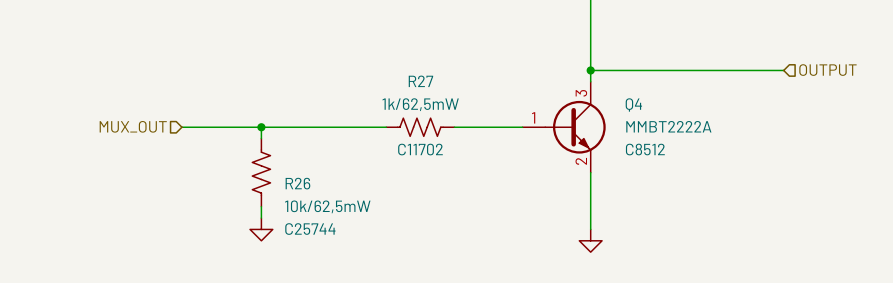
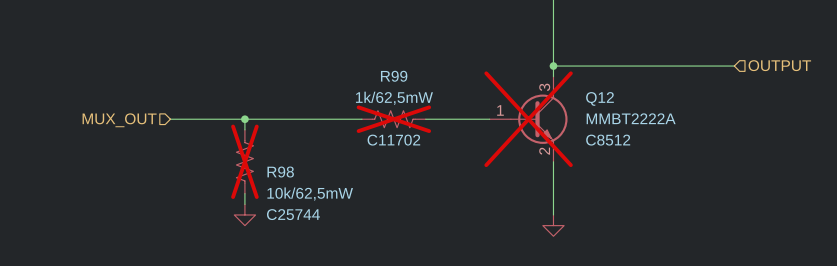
R27 name: R27 (420, 81) -> R99 (394, 76)
Q4 name: Q4 (633, 104) -> Q12 (599, 98)
R27 do-not-place cross: none -> (393, 119)
Q4 do-not-place cross: none -> (528, 119)
R26 do-not-place cross: none -> (244, 161)
R26 name: R26 (297, 183) -> R98 (280, 172)

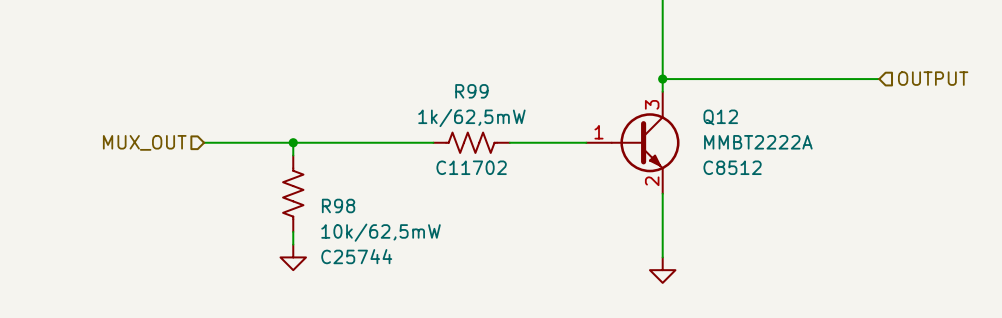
R99 do-not-place cross: (393, 119) -> none
Q12 do-not-place cross: (528, 119) -> none
R98 do-not-place cross: (244, 161) -> none

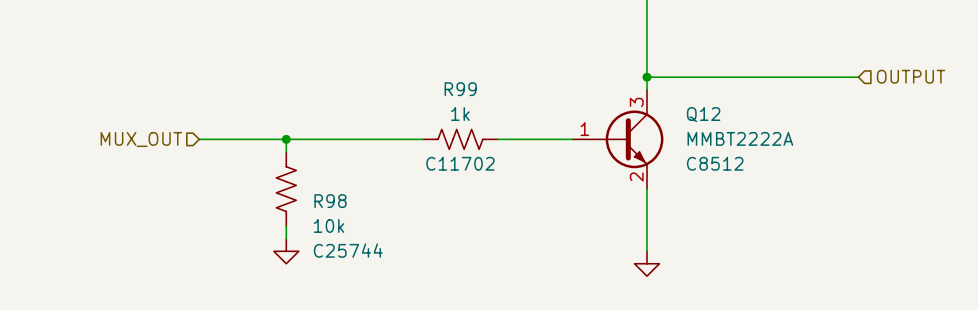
R99 value: 1k/62,5mW (471, 118) -> 1k (460, 114)
R98 value: 10k/62,5mW (381, 232) -> 10k (329, 225)

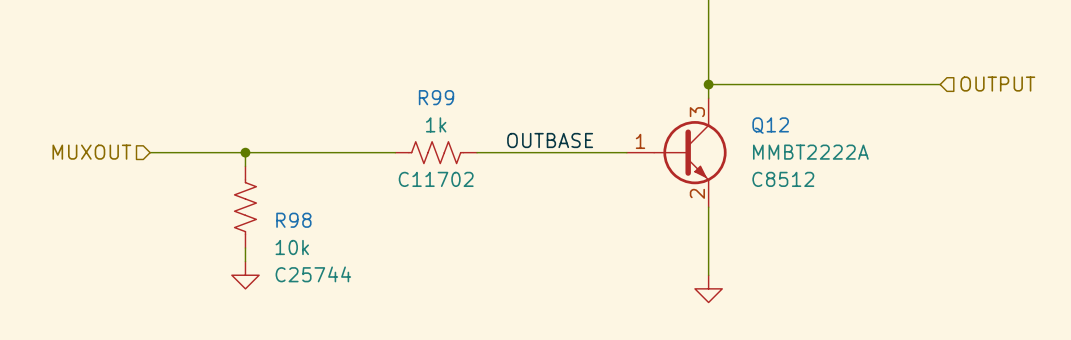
label: none -> OUTBASE (550, 140)
wire: none -> (150, 152) (218, 152)
hierarchical label: MUX_OUT (141, 139) -> MUXOUT (91, 152)
junction: none -> (245, 152)
wire: (286, 139) (286, 151) -> (245, 152) (245, 166)
junction: (286, 139) -> none
wire: (360, 139) (423, 139) -> (477, 152) (545, 152)
R99 position: (460, 139) -> (436, 152)
R98 position: (286, 189) -> (245, 207)
wire: (286, 226) (286, 238) -> (245, 248) (245, 261)
power symbol position: (286, 251) -> (245, 275)

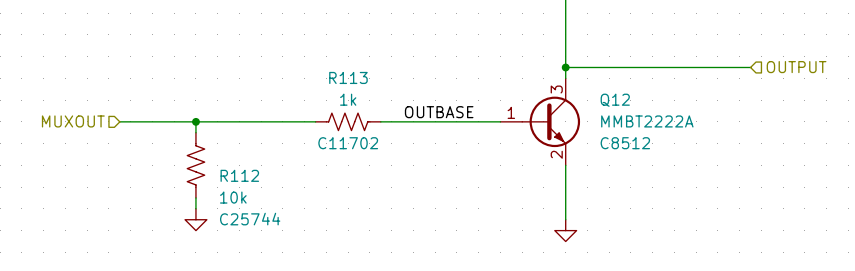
R99 name: R99 (436, 97) -> R113 (348, 77)
R98 name: R98 (293, 220) -> R112 (239, 175)

